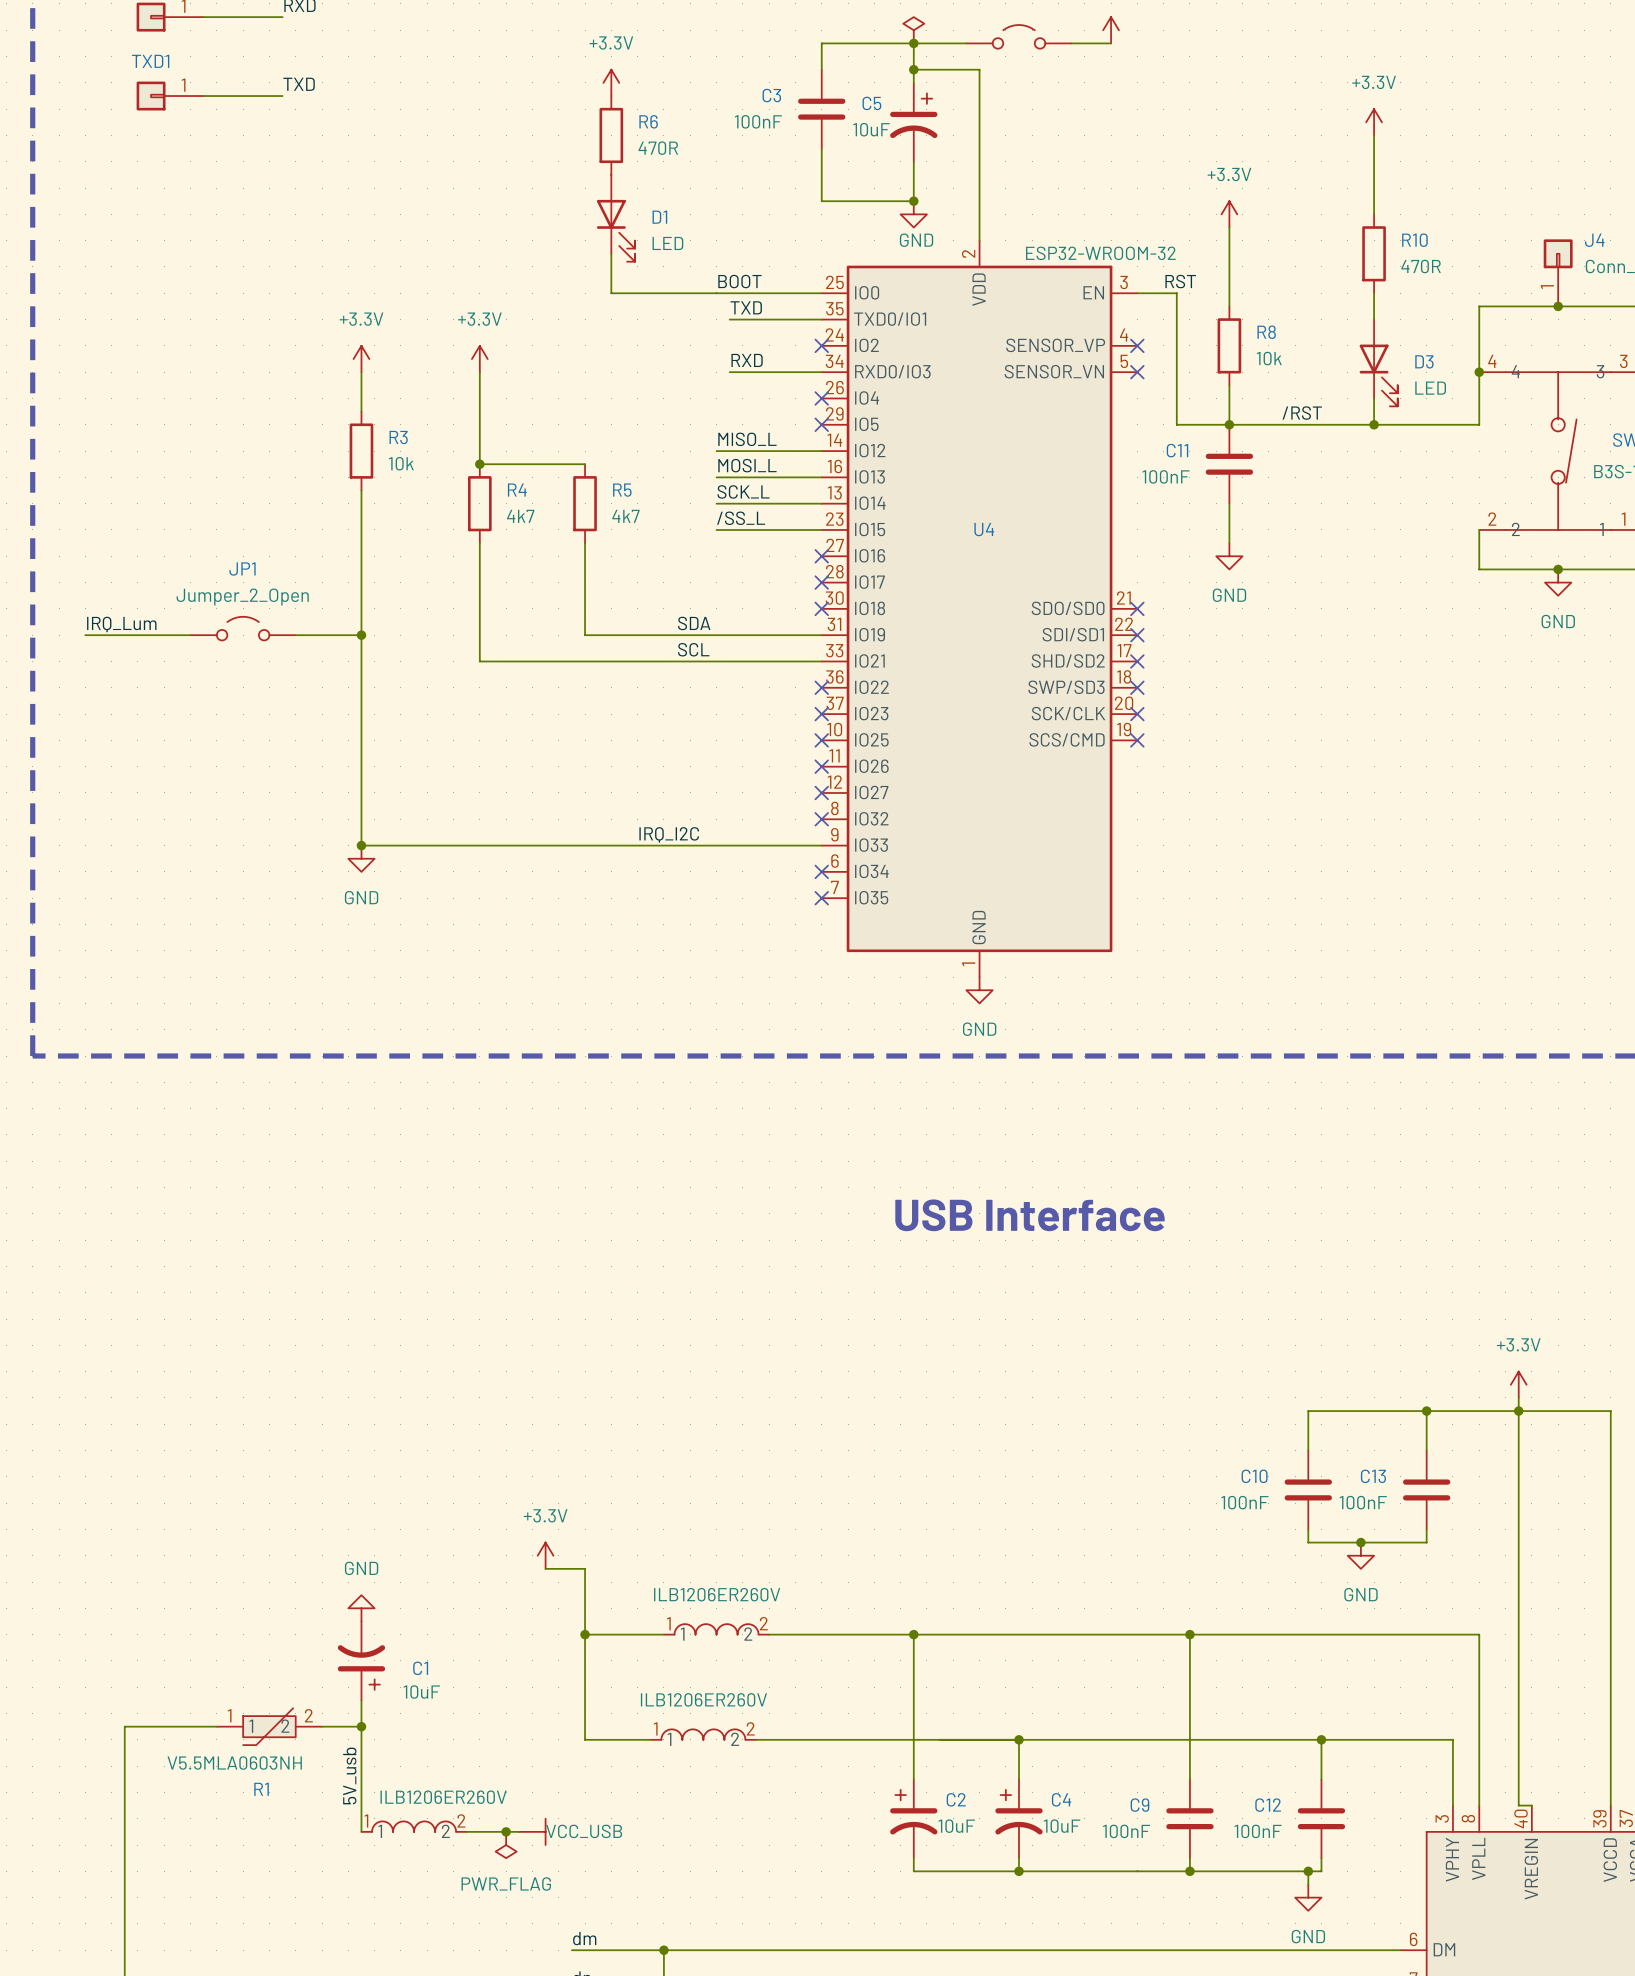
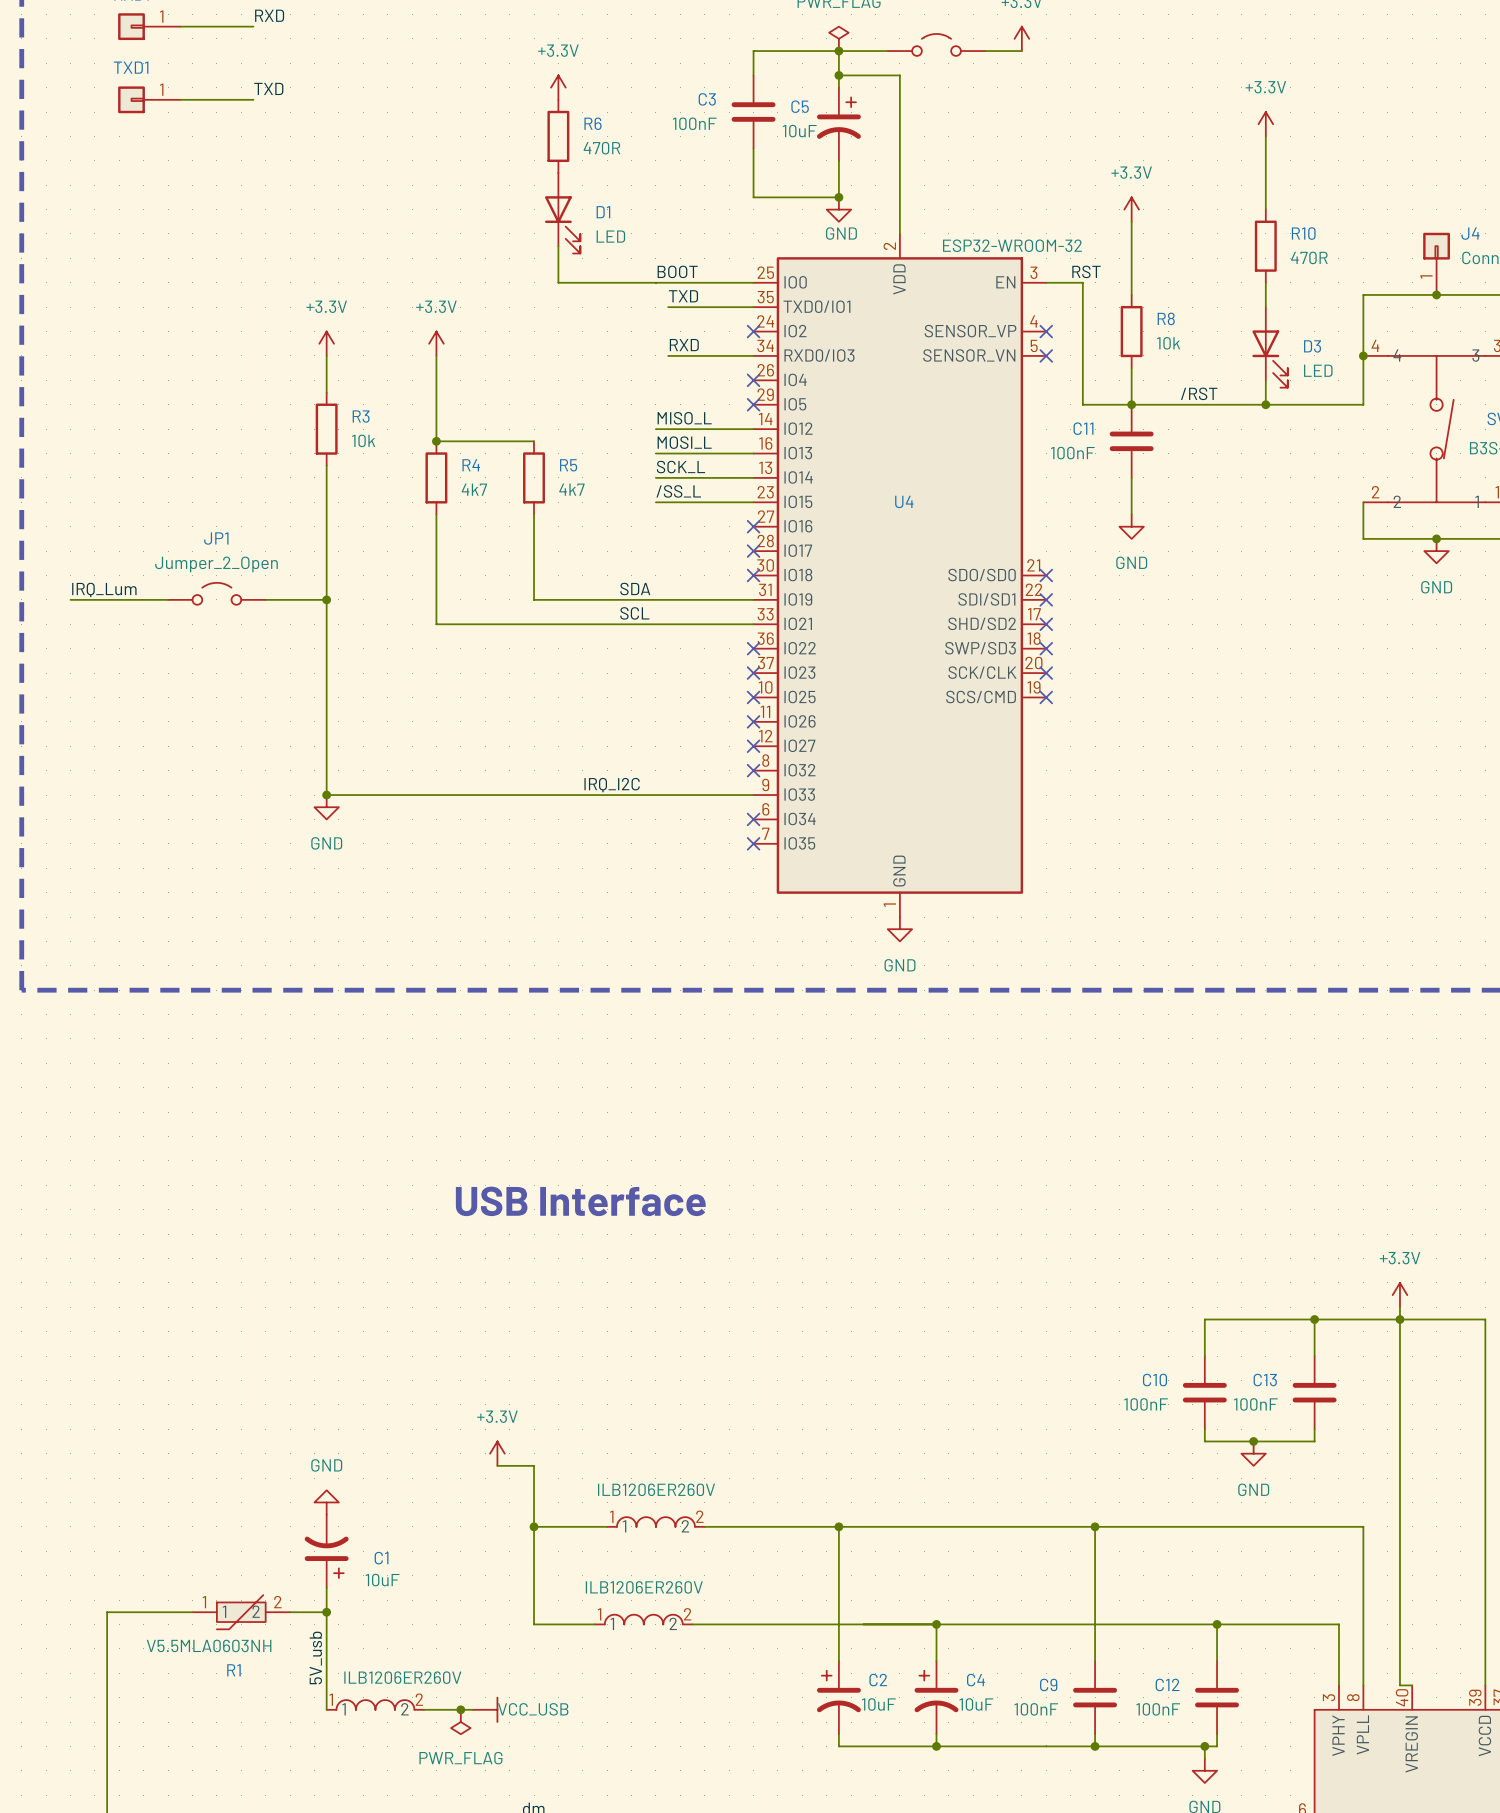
text: USB Interface (1030, 1215) -> none
text: none -> USB Interface (580, 1201)

